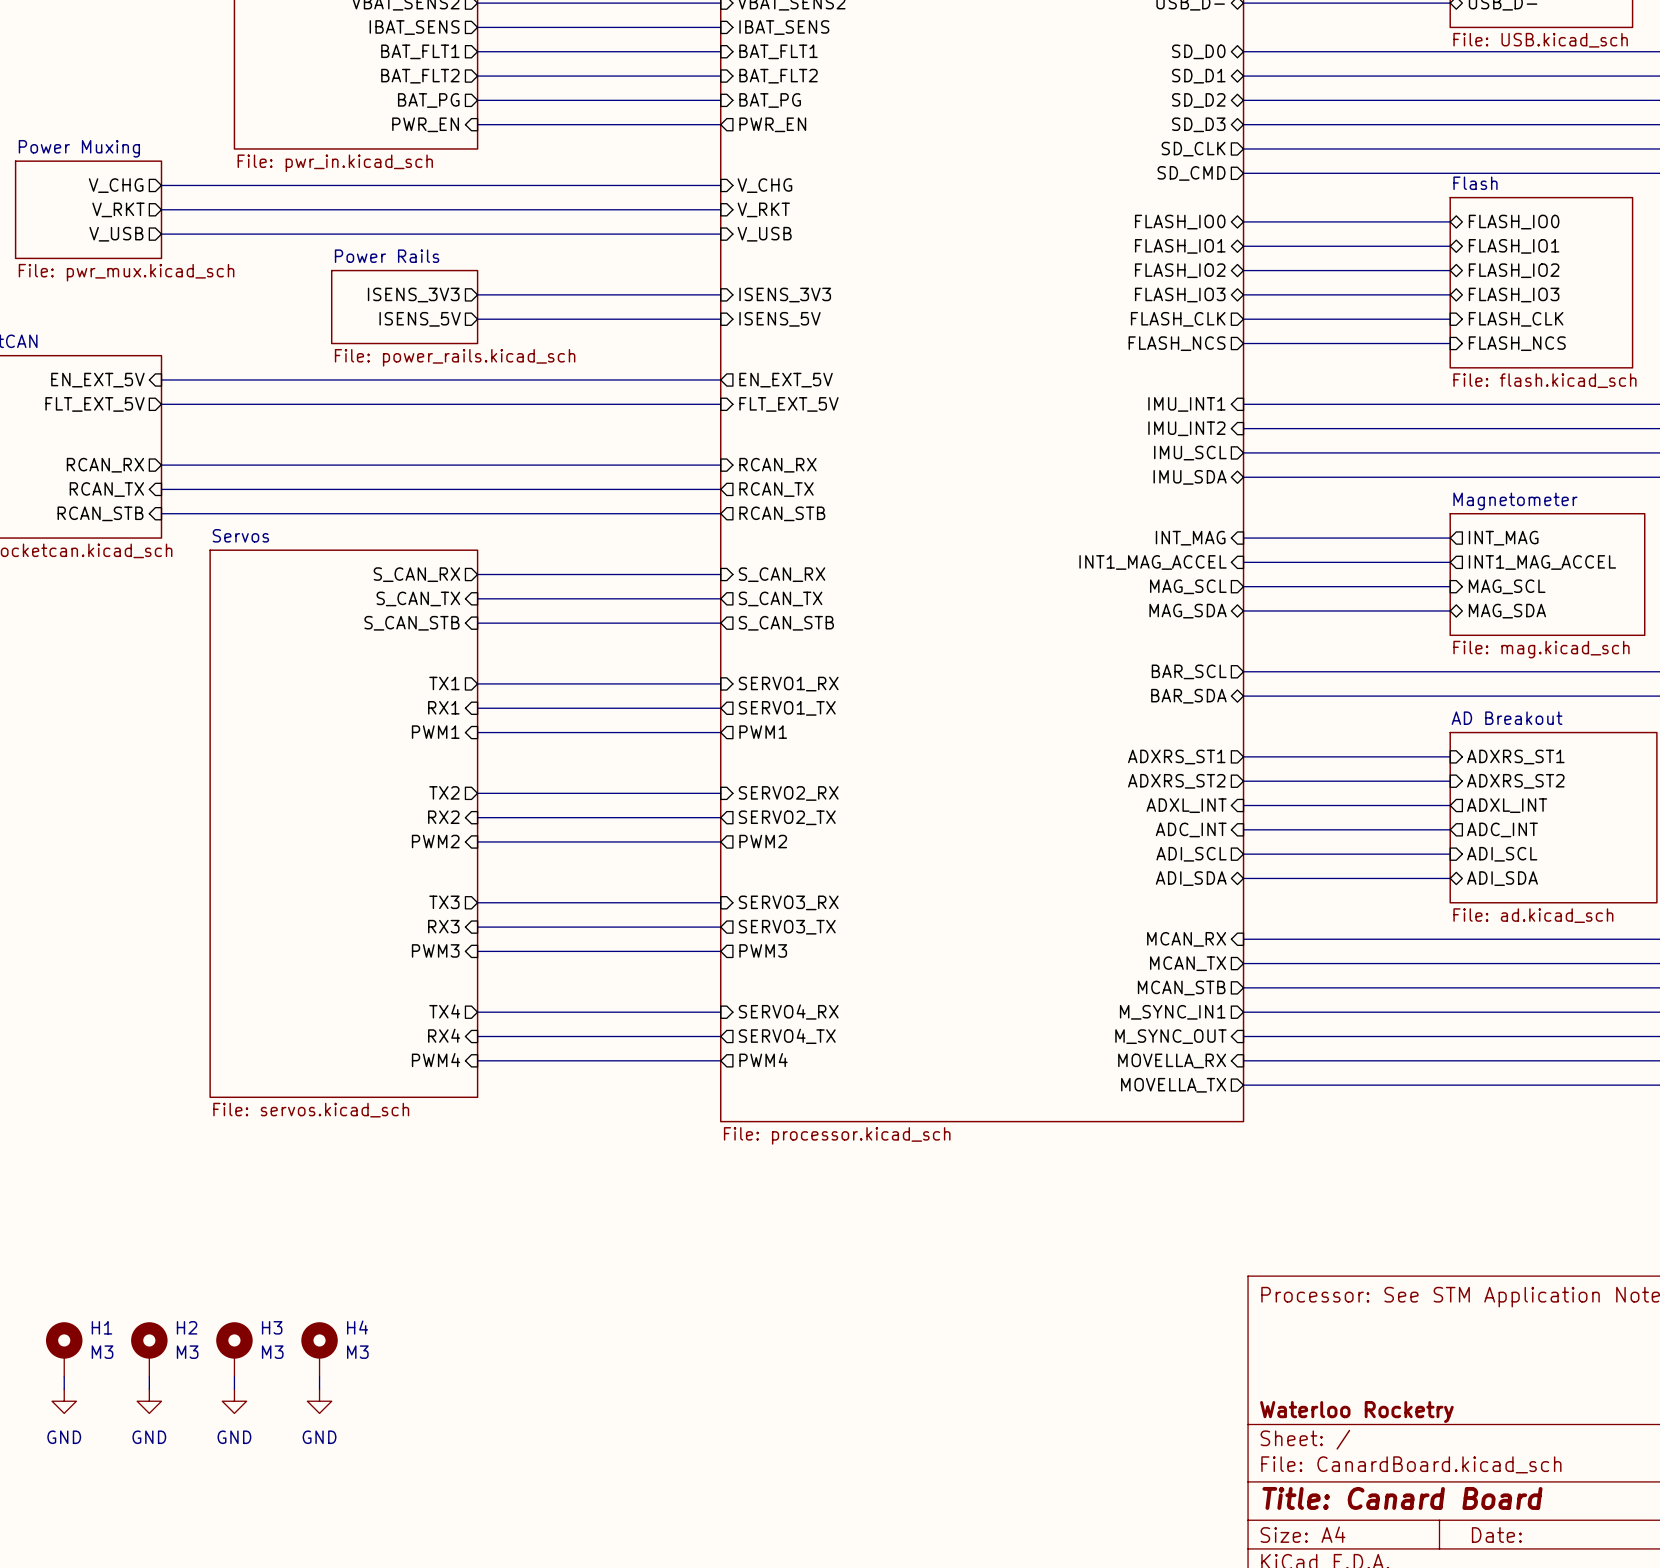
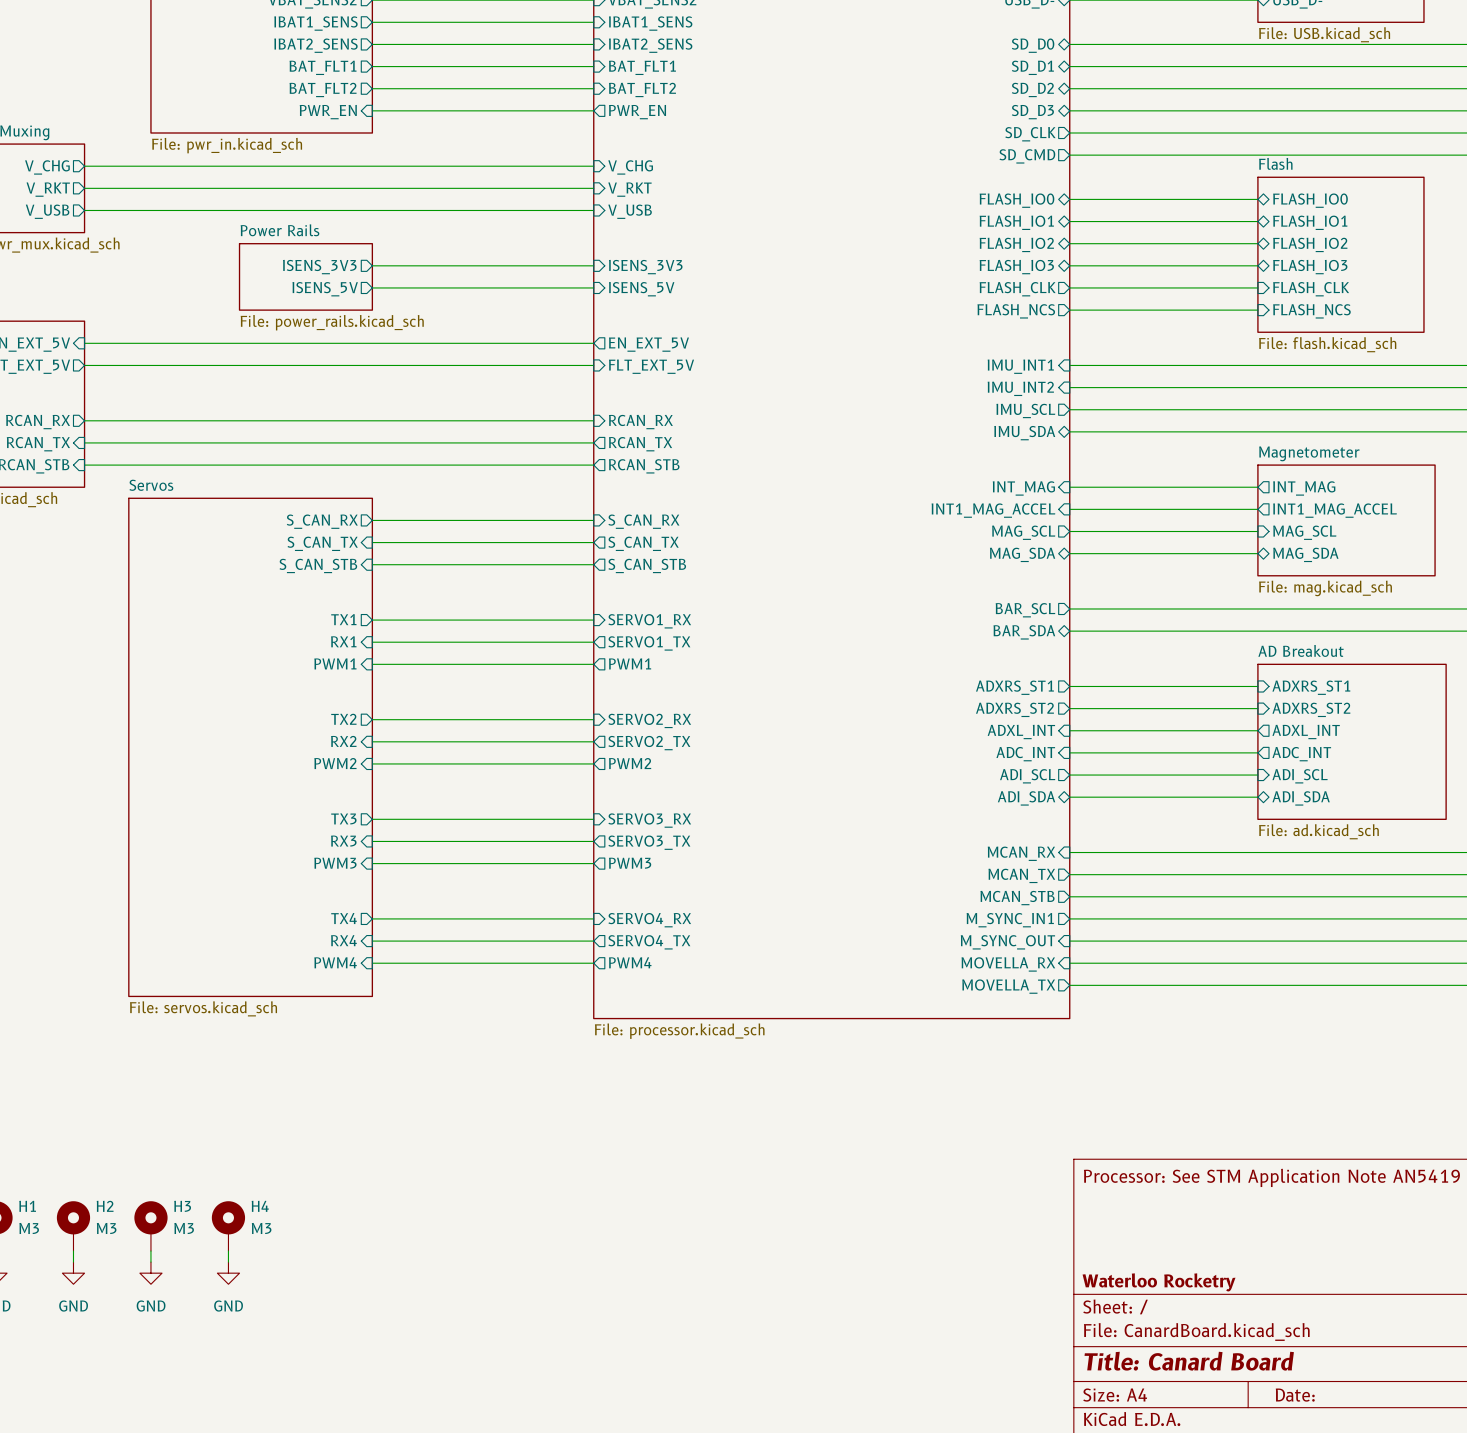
sheet pin: IBAT_SENS (414, 27) -> IBAT1_SENS (315, 23)
sheet pin: IBAT_SENS (784, 27) -> IBAT1_SENS (650, 23)
sheet pin: BAT_FLT1 (420, 51) -> IBAT2_SENS (315, 45)
sheet pin: BAT_FLT1 (778, 51) -> IBAT2_SENS (650, 45)
sheet pin: BAT_FLT2 (420, 76) -> BAT_FLT1 (323, 67)
sheet pin: BAT_FLT2 (778, 76) -> BAT_FLT1 (642, 67)
sheet pin: BAT_PG (428, 100) -> BAT_FLT2 (323, 89)
sheet pin: BAT_PG (770, 100) -> BAT_FLT2 (642, 89)

